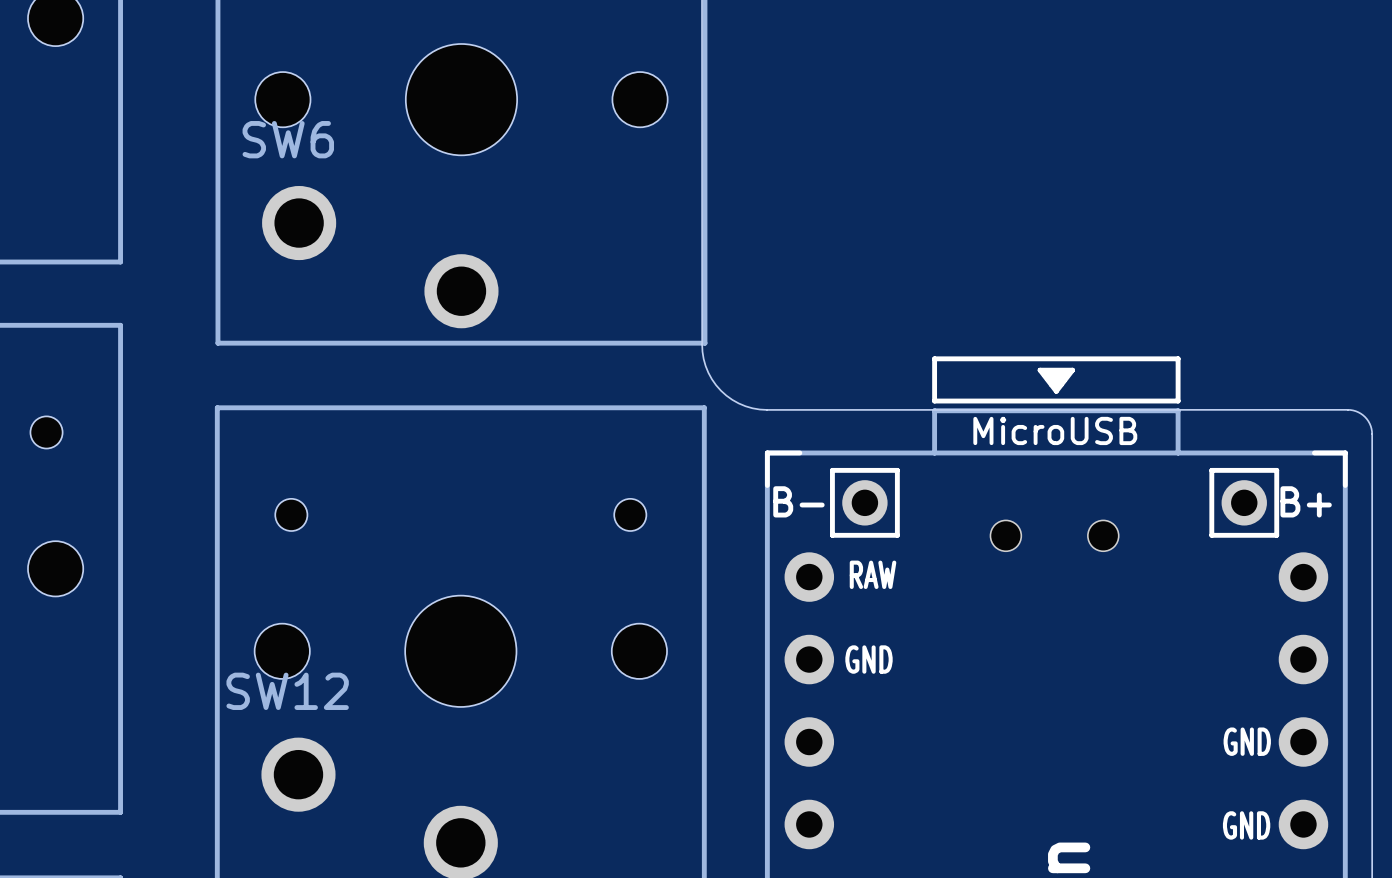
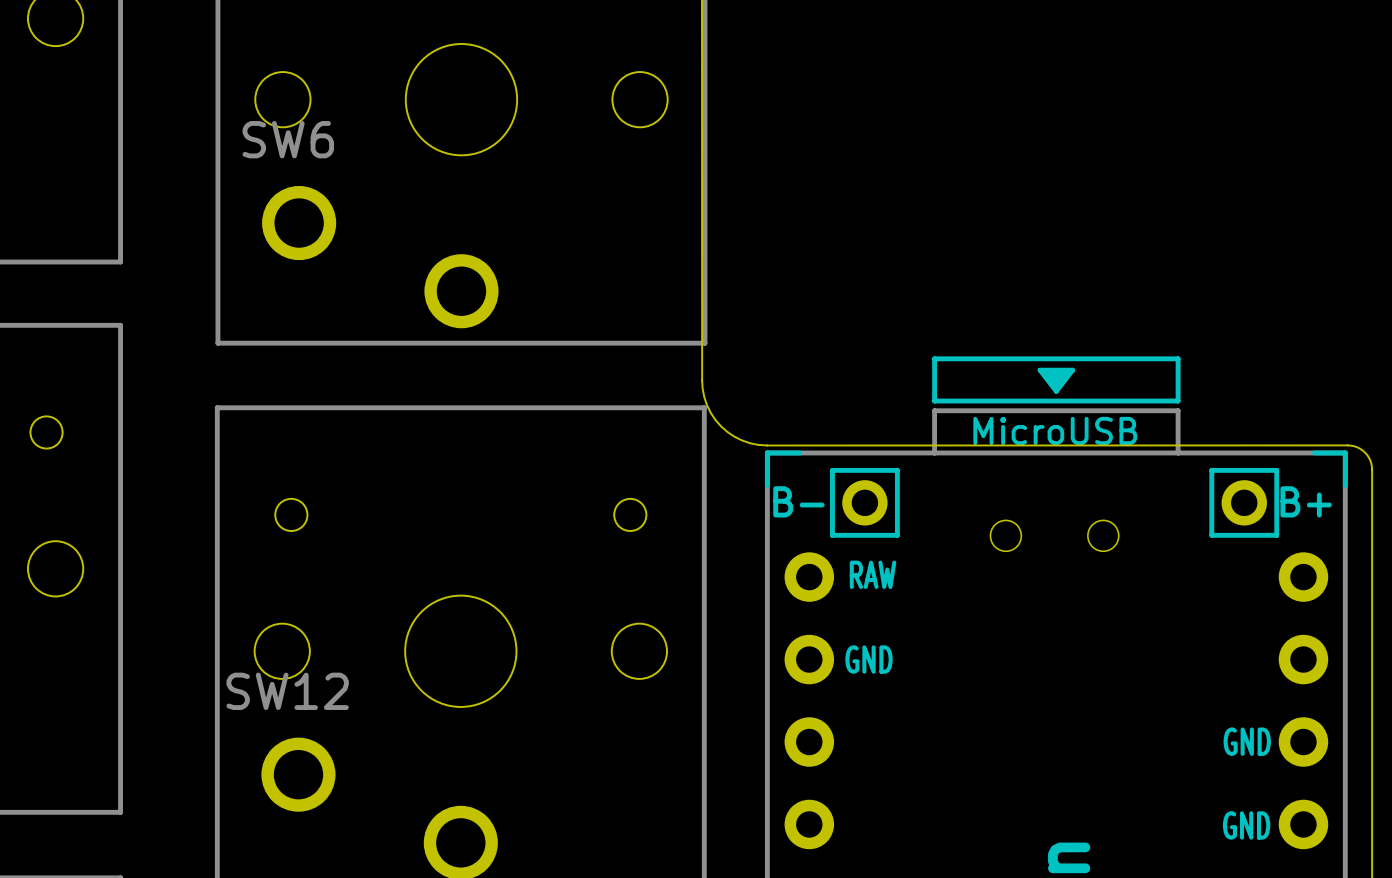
board edge: (702, 344) (705, 366) (716, 385) (726, 395) (738, 403) (759, 409) (1353, 410) (1365, 416) (1370, 426) (1372, 469) -> (702, 344) (702, 389) (710, 413) (727, 432) (742, 440) (758, 444) (1347, 445) (1357, 447) (1365, 452) (1370, 460) (1372, 469)

